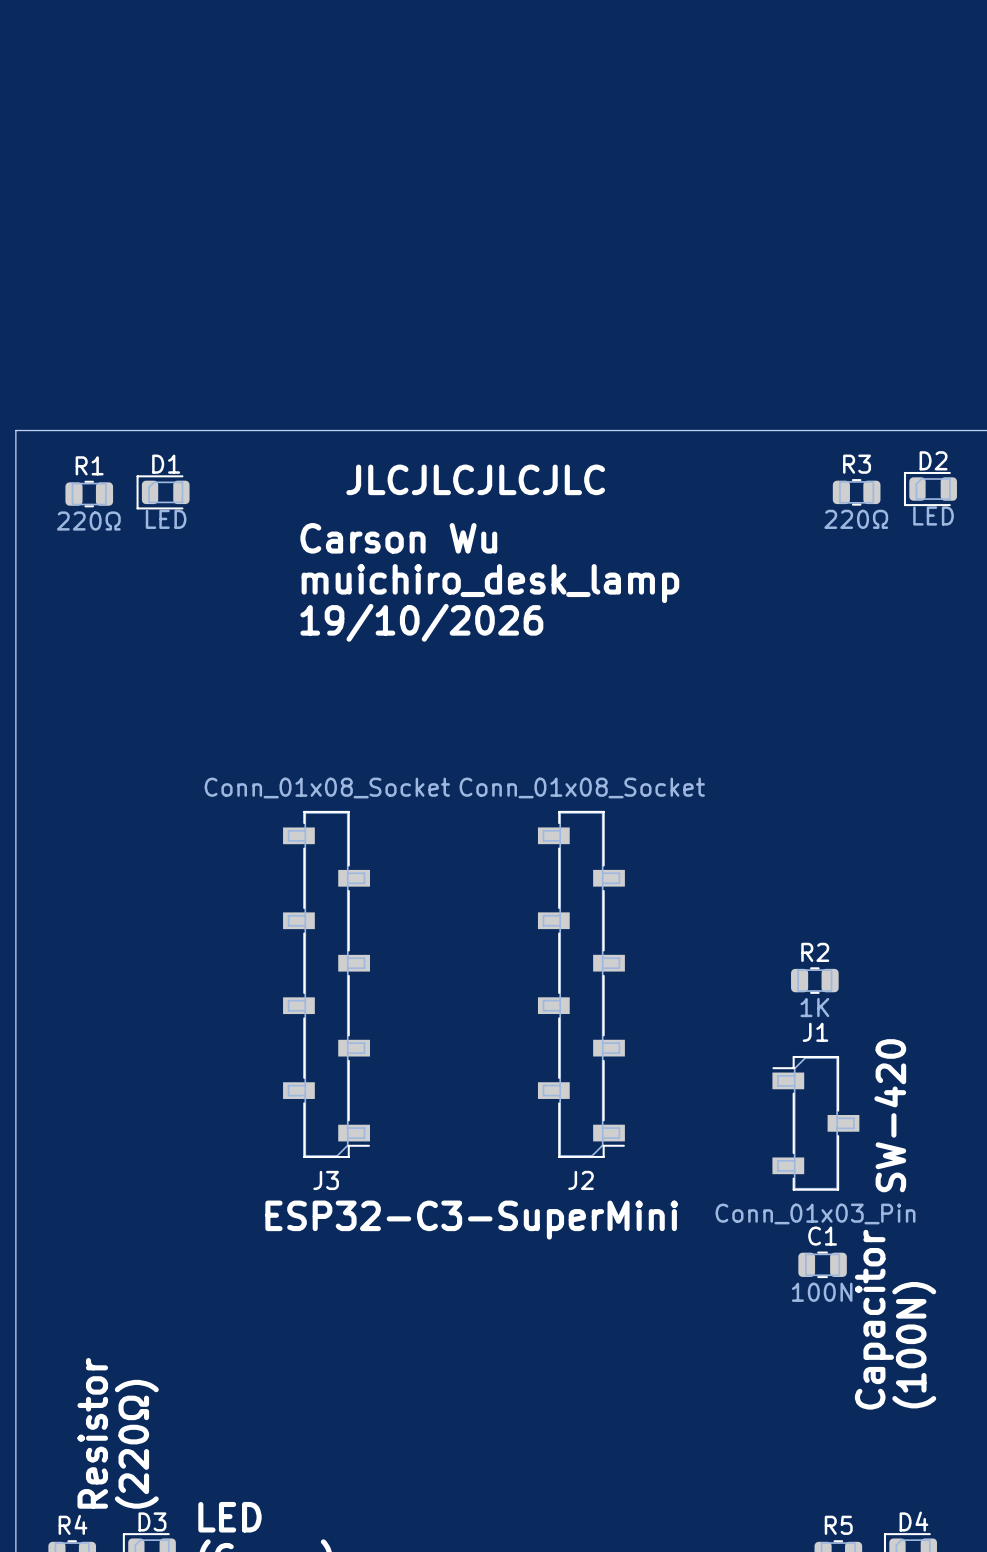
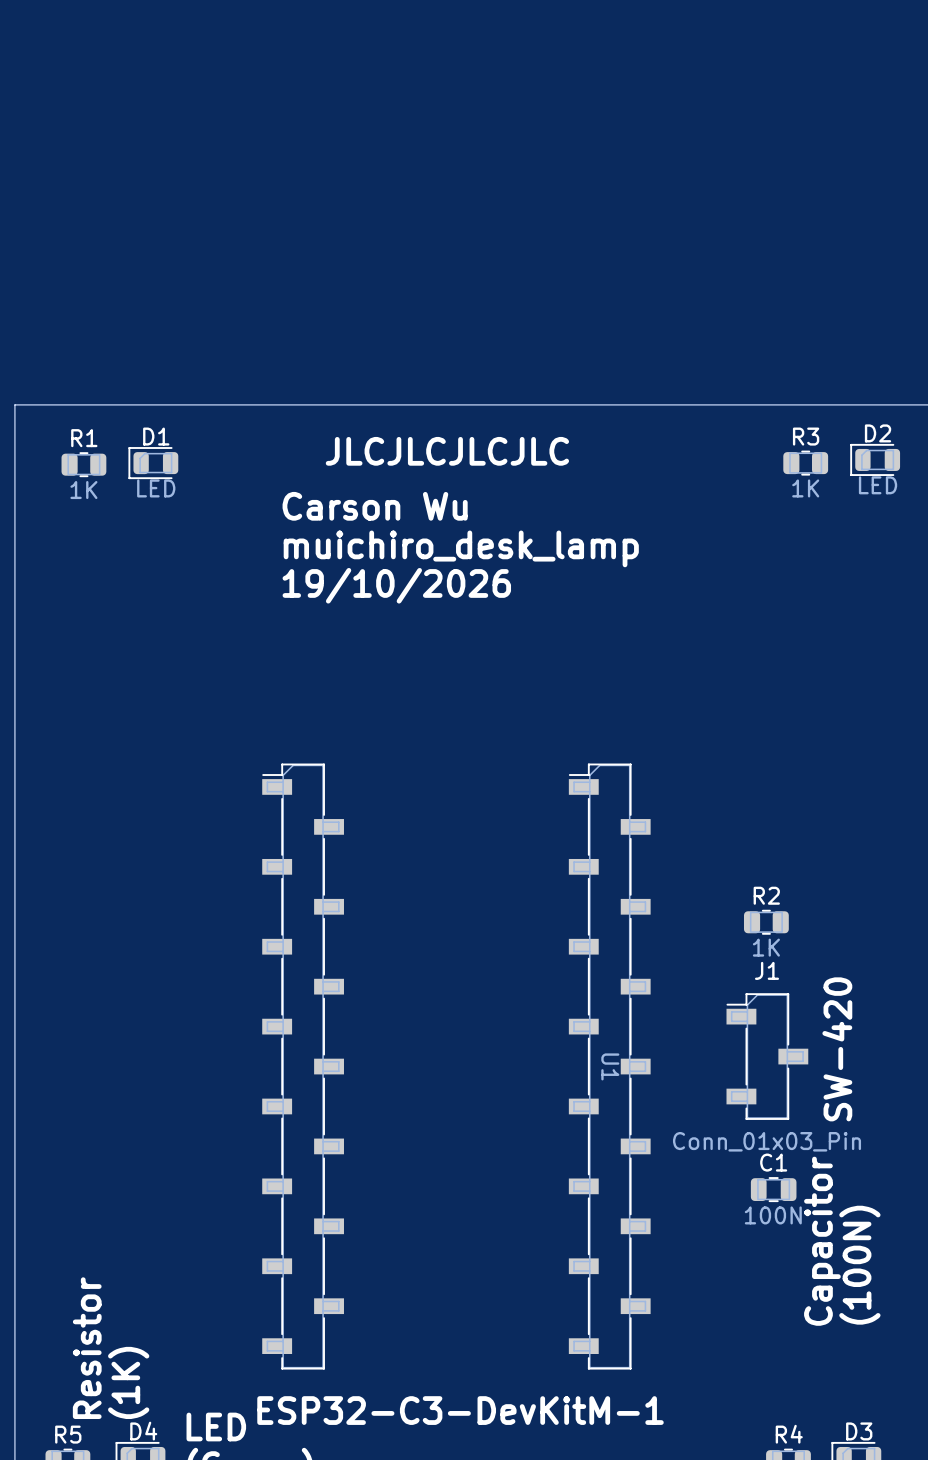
R3 value: 220Ω (856, 519) -> 1K (805, 488)
R1 value: 220Ω (88, 521) -> 1K (83, 490)
J3: Conn_01x08_Socket (326, 984) -> none
J2: Conn_01x08_Socket (581, 984) -> none
U1: none -> (456, 1066)
text: ESP32-C3-SuperMini (471, 1220) -> none
text: (220Ω) (136, 1444) -> (1K) (128, 1382)
text: none -> ESP32-C3-DevKitM-1 (460, 1410)
D3 name: D3 (152, 1521) -> D4 (143, 1431)
D4 name: D4 (913, 1521) -> D3 (859, 1431)
R4 name: R4 (73, 1524) -> R5 (68, 1434)
R5 name: R5 (838, 1525) -> R4 (789, 1434)

